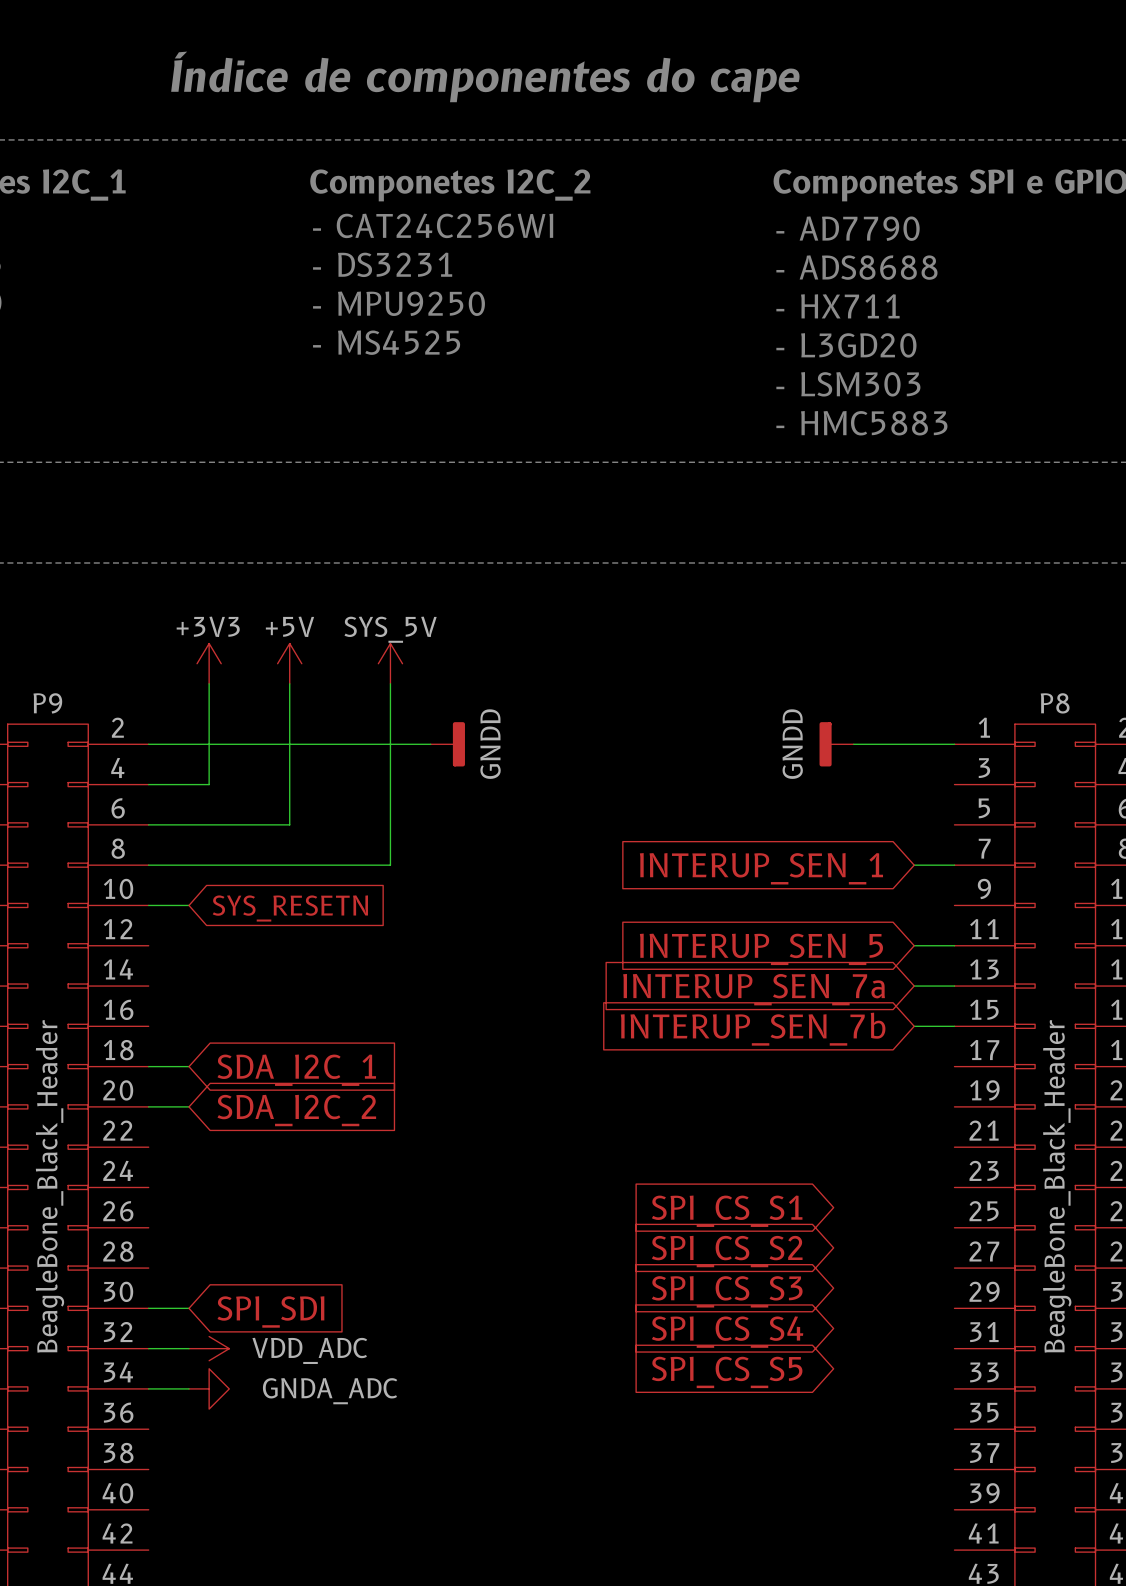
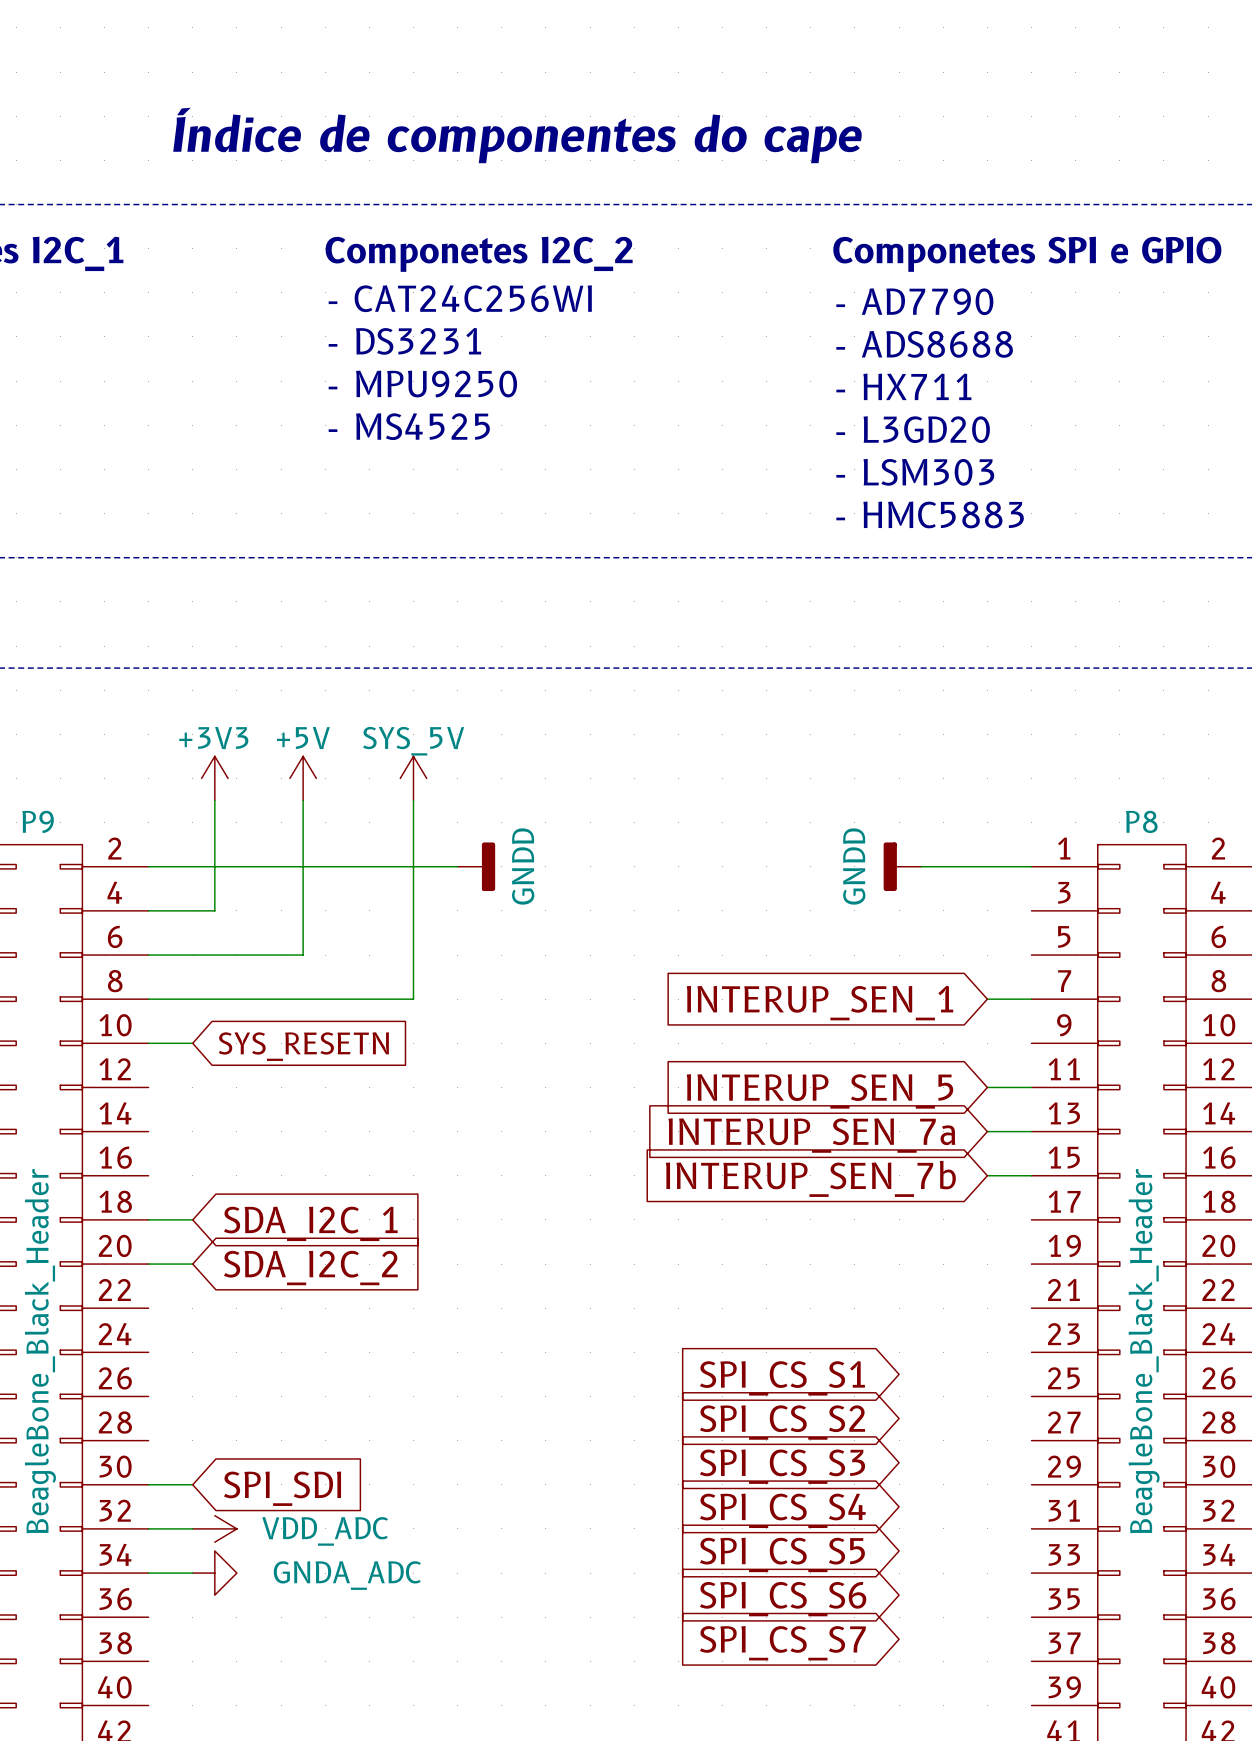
global label: none -> SPI_CS_S6 (783, 1599)
global label: none -> SPI_CS_S7 (782, 1643)

